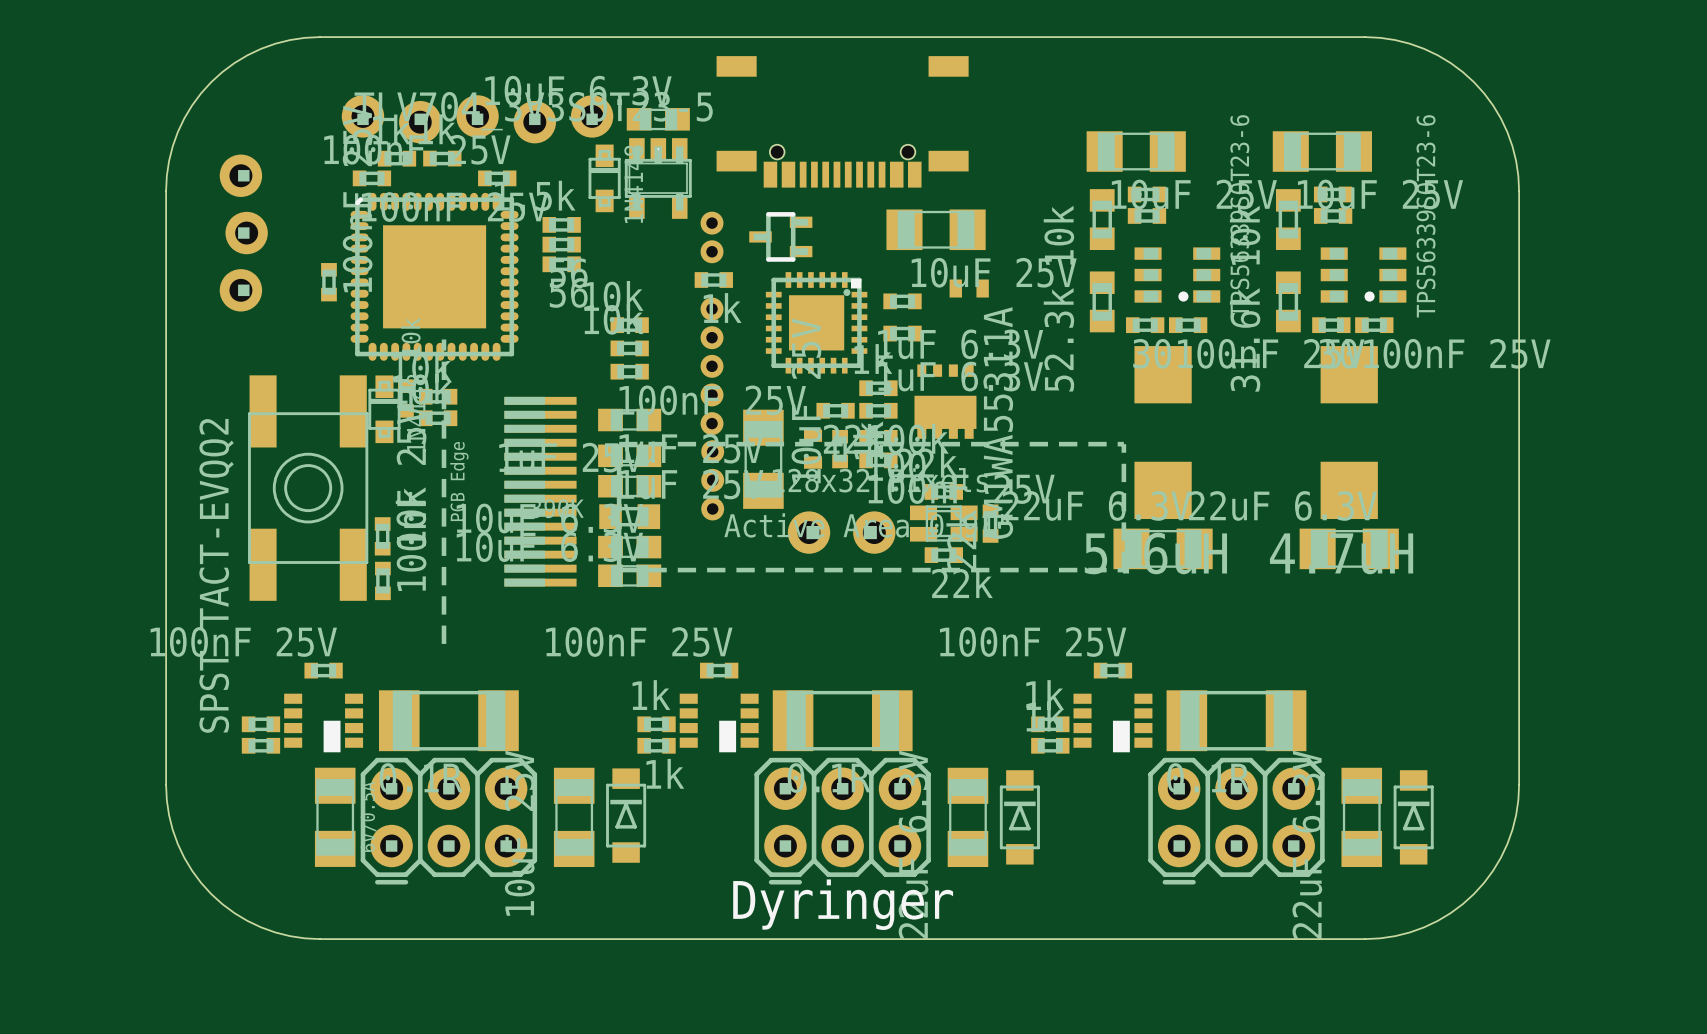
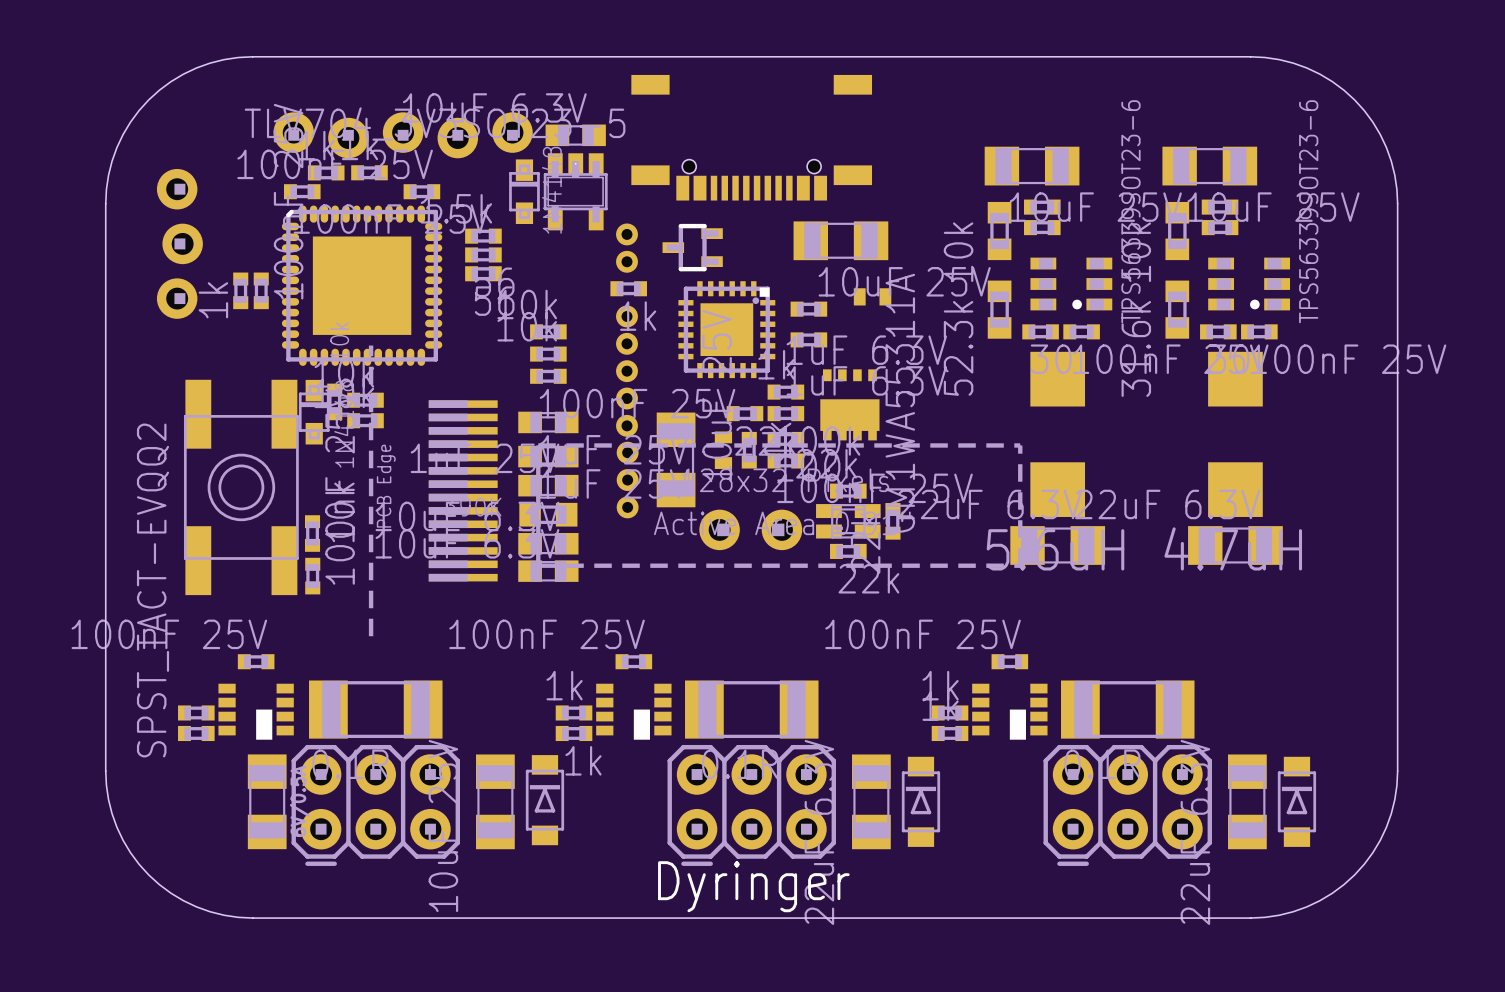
part: none -> 1k (240, 290)

